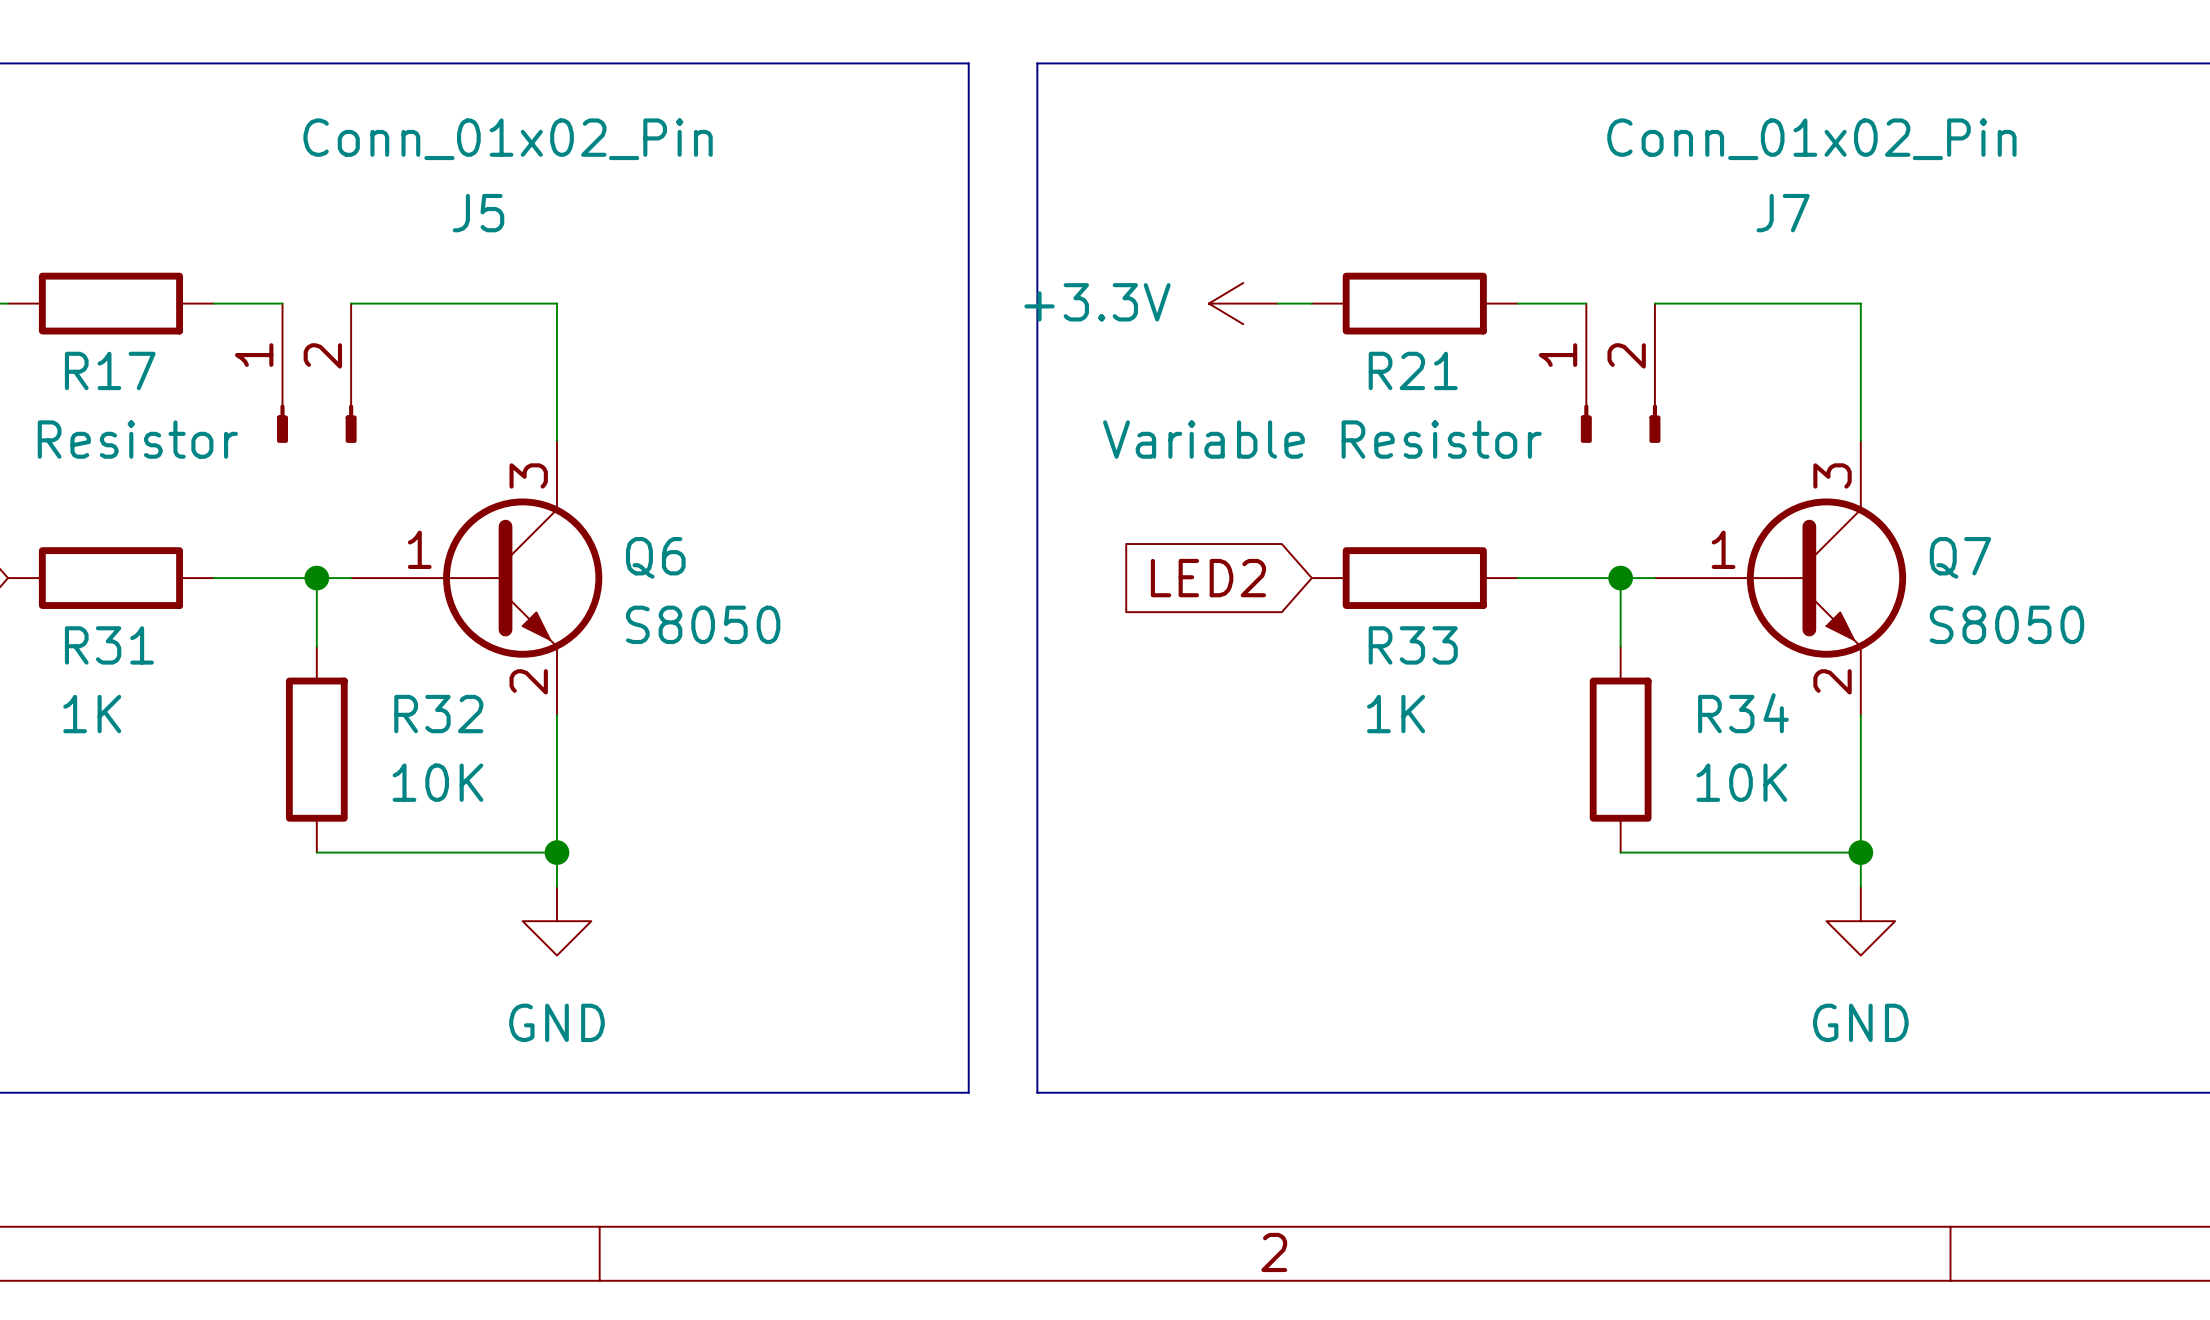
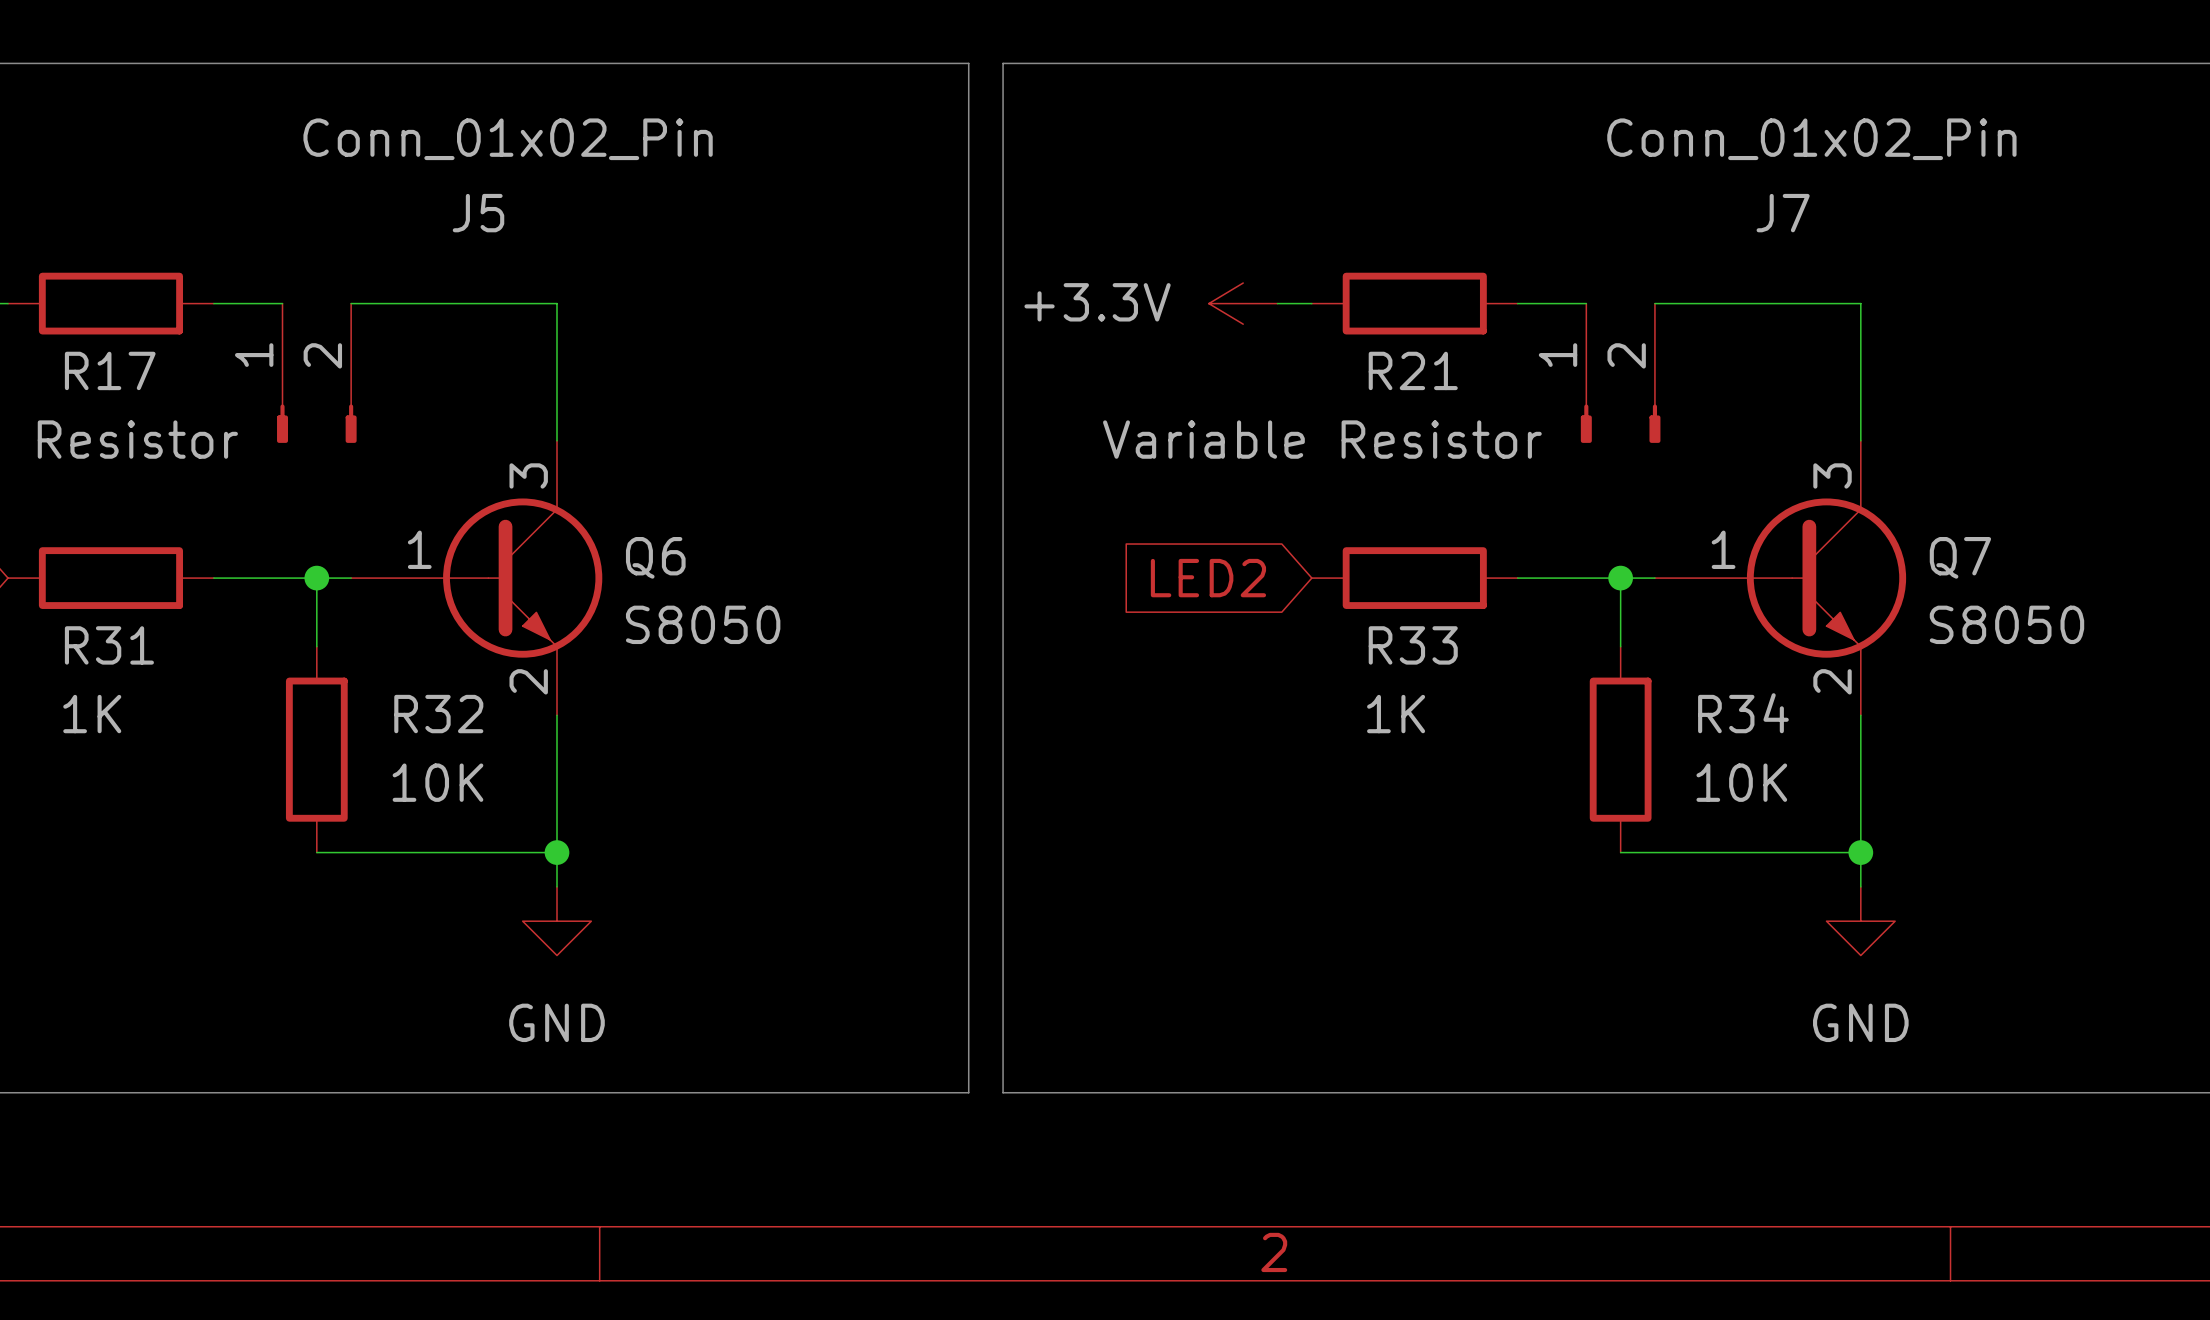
line: (1037, 63) (1037, 1092) -> (1037, 63) (1003, 63) (1003, 1092) (1037, 1092)

